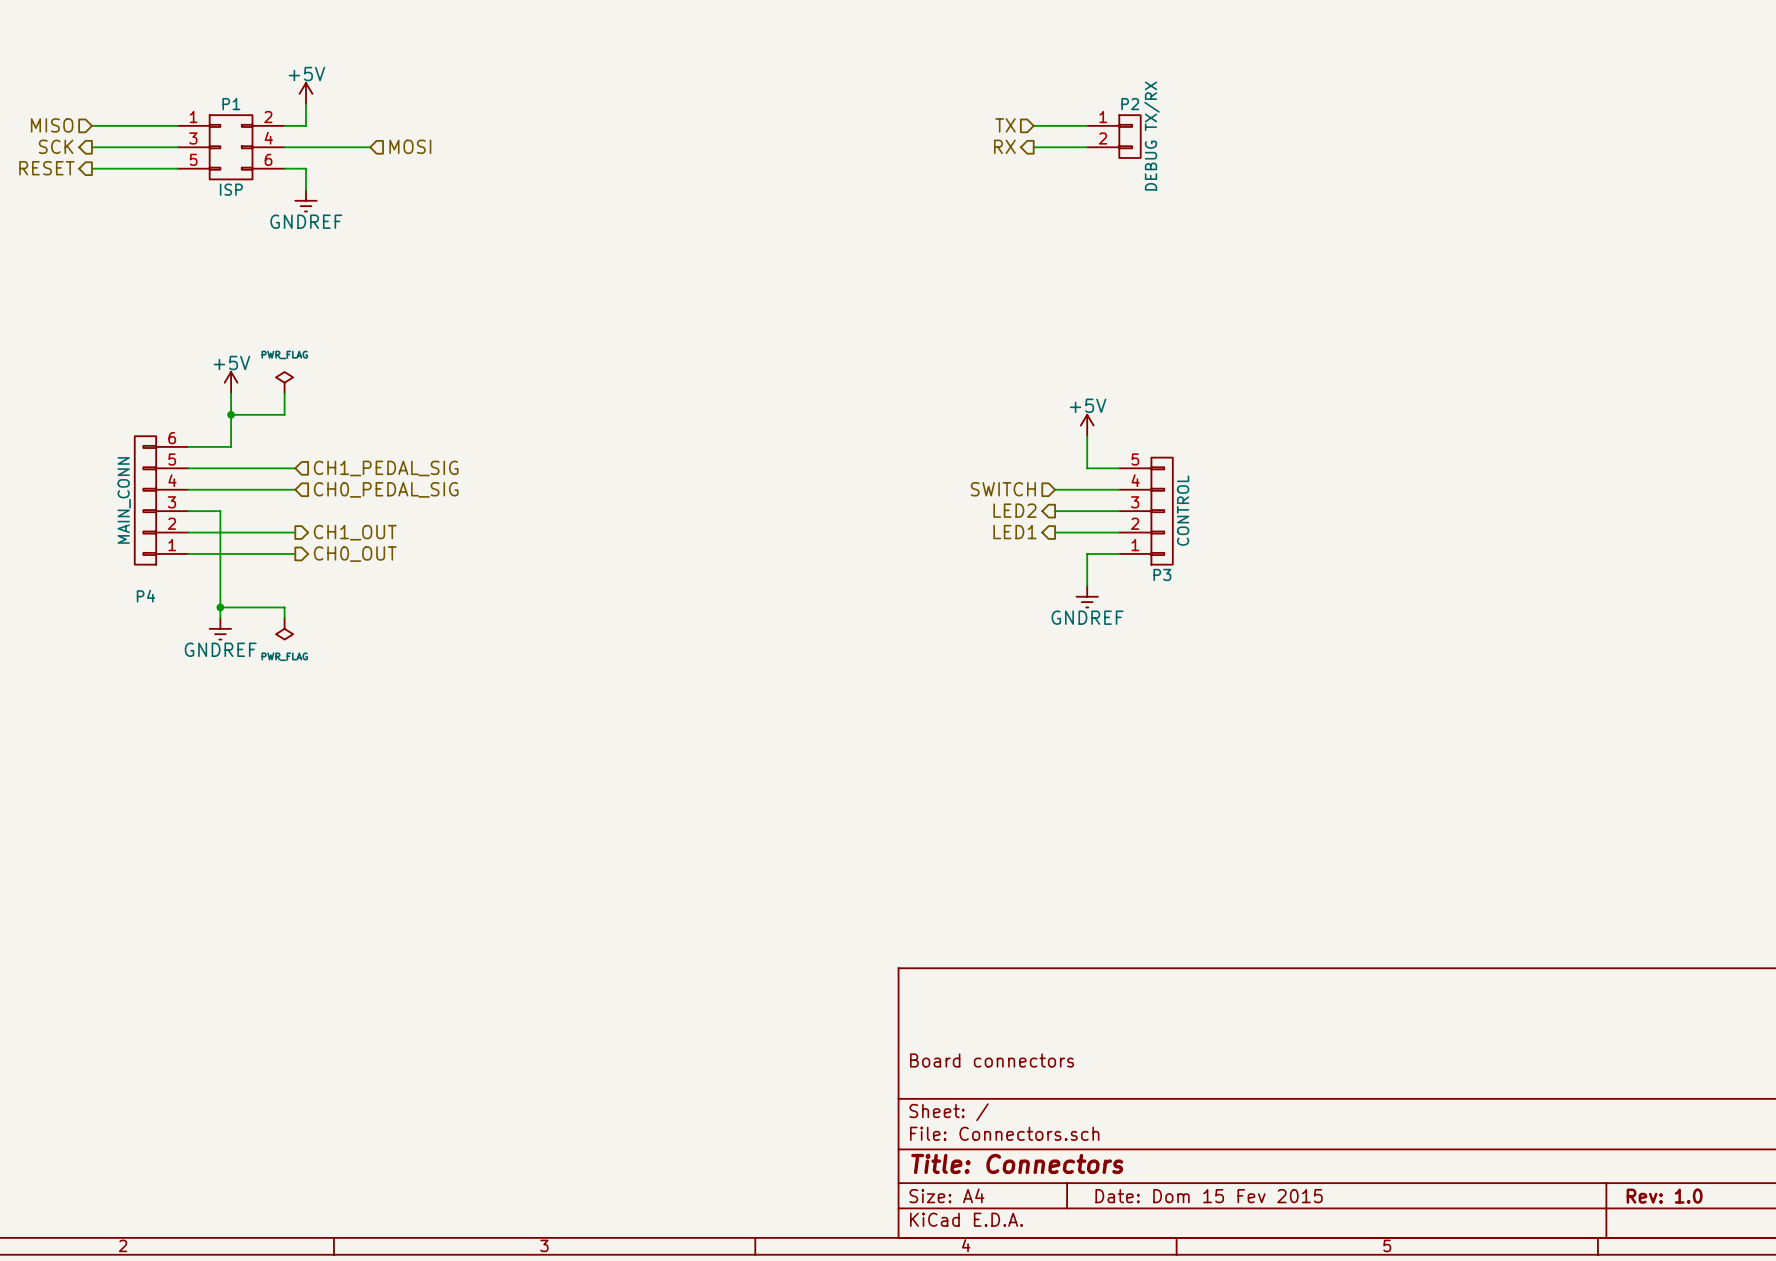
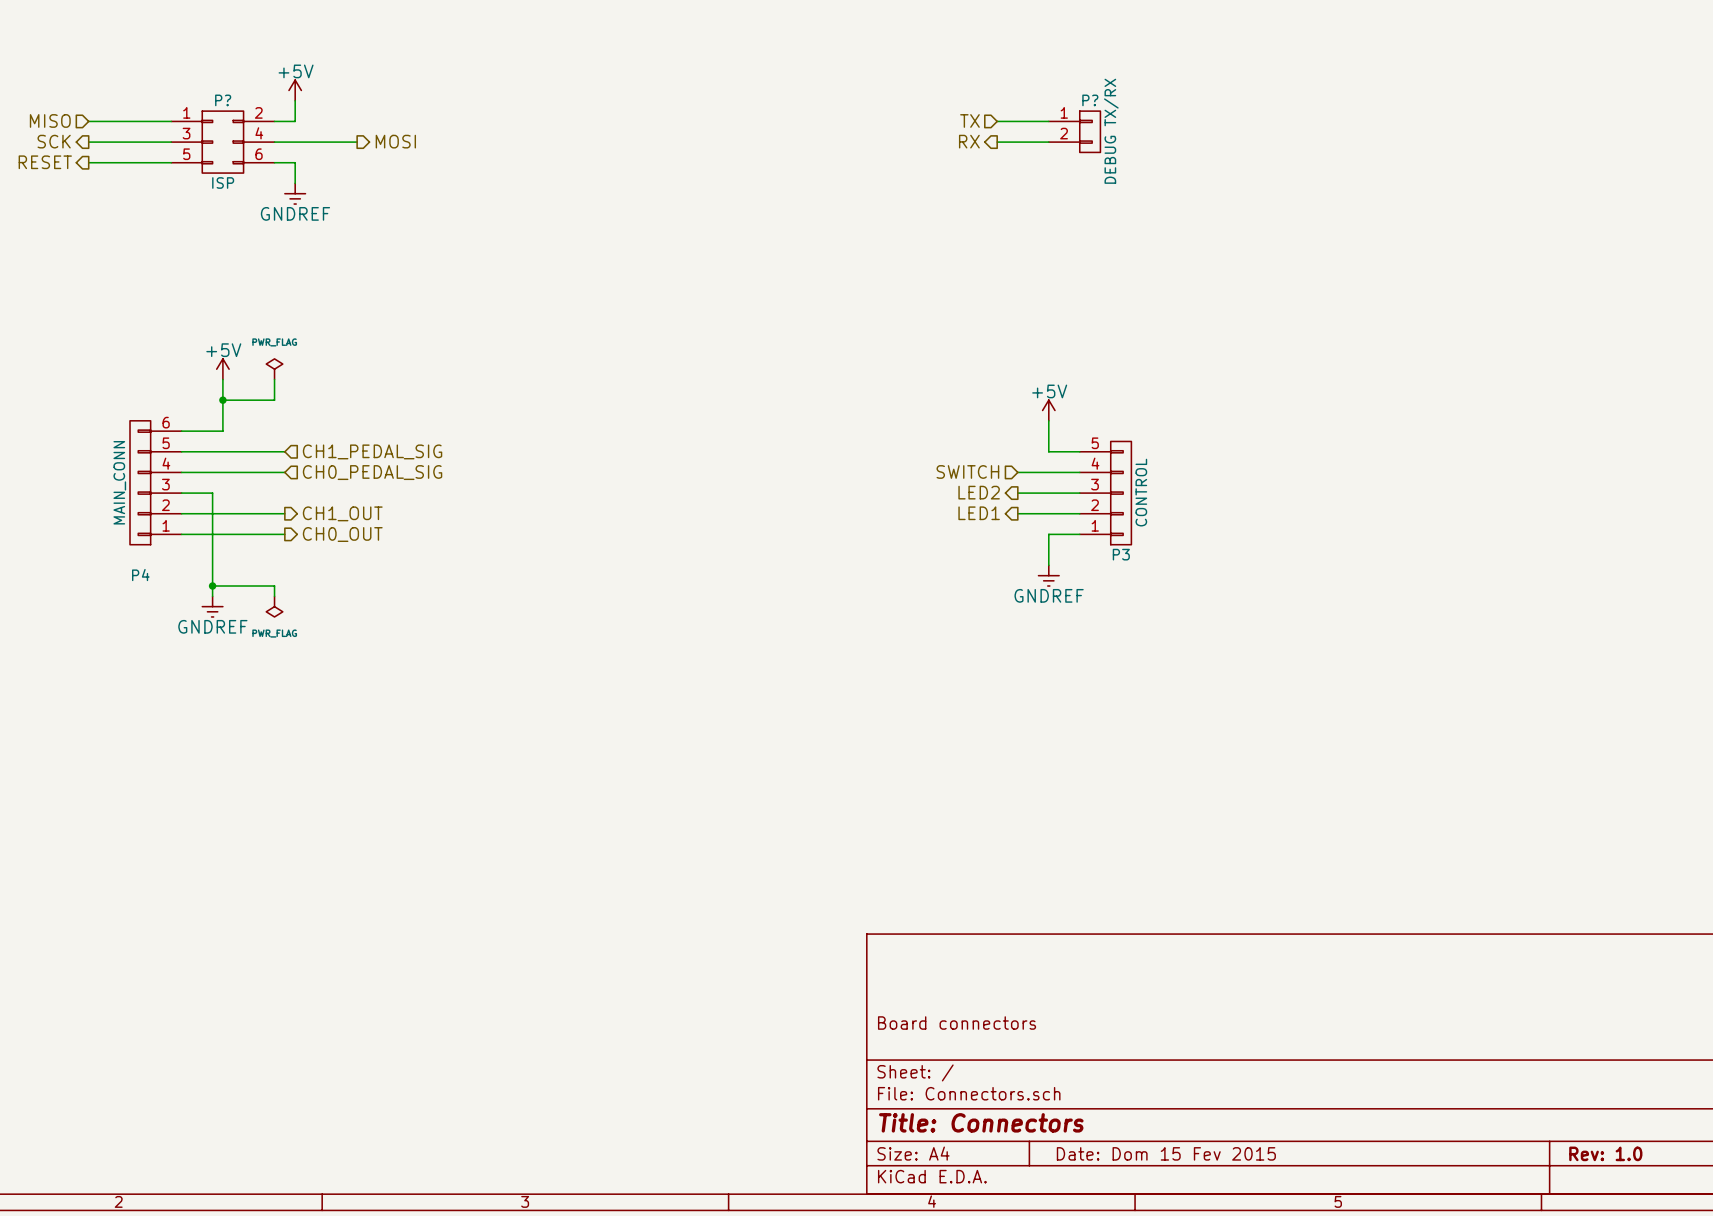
P1 name: P1 (231, 104) -> P? (223, 100)
P2 name: P2 (1130, 104) -> P? (1090, 100)
hierarchical label shape: input (410, 146) -> output (395, 141)

